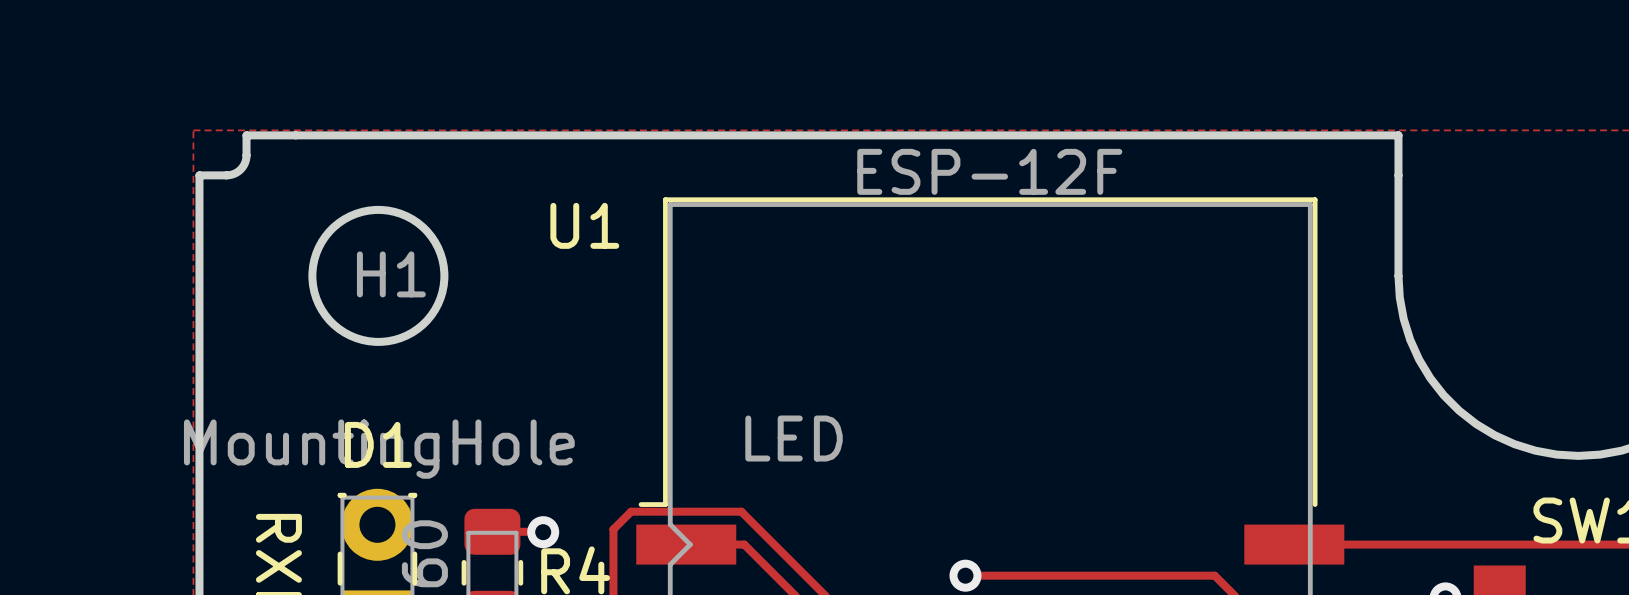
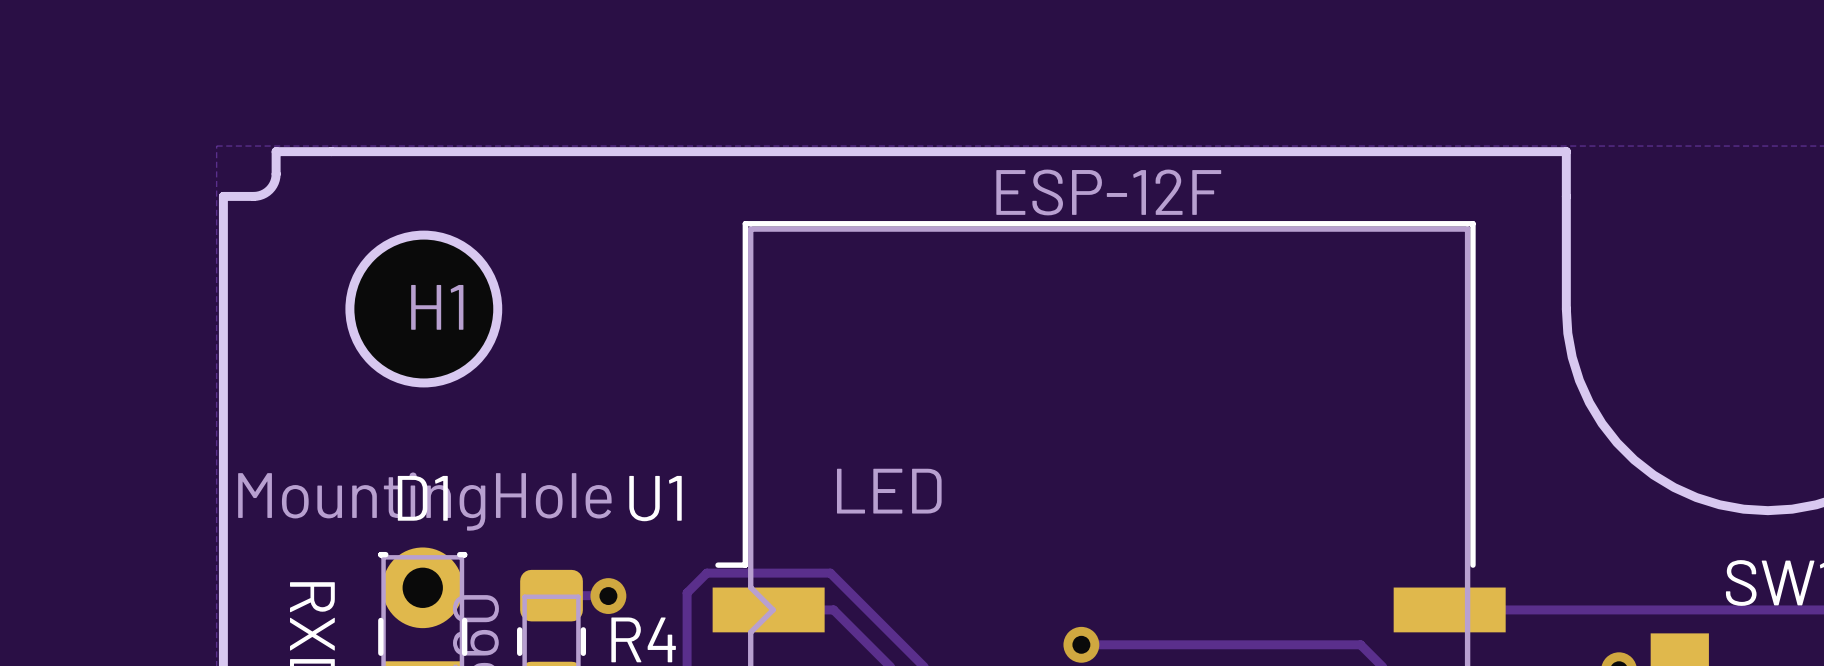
U1 name position: U1 (584, 225) -> U1 (655, 498)

